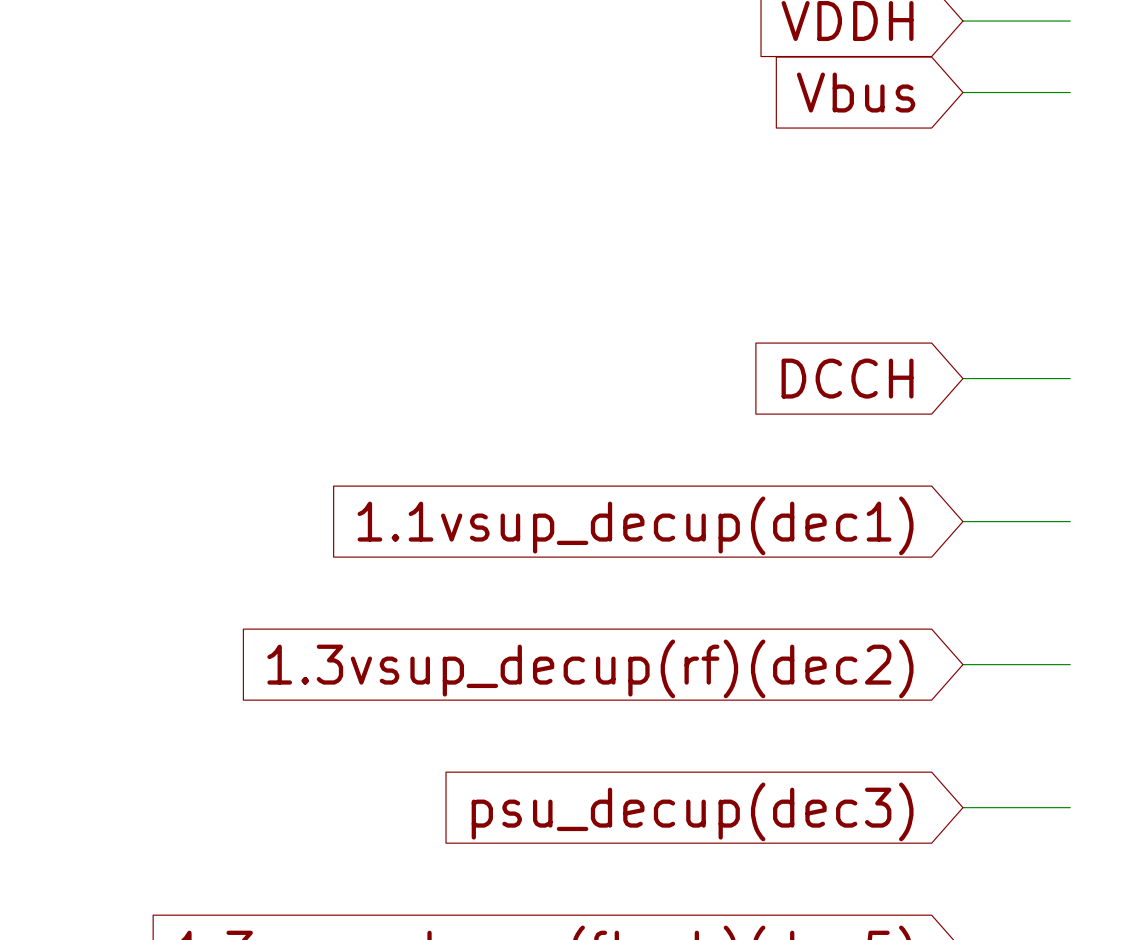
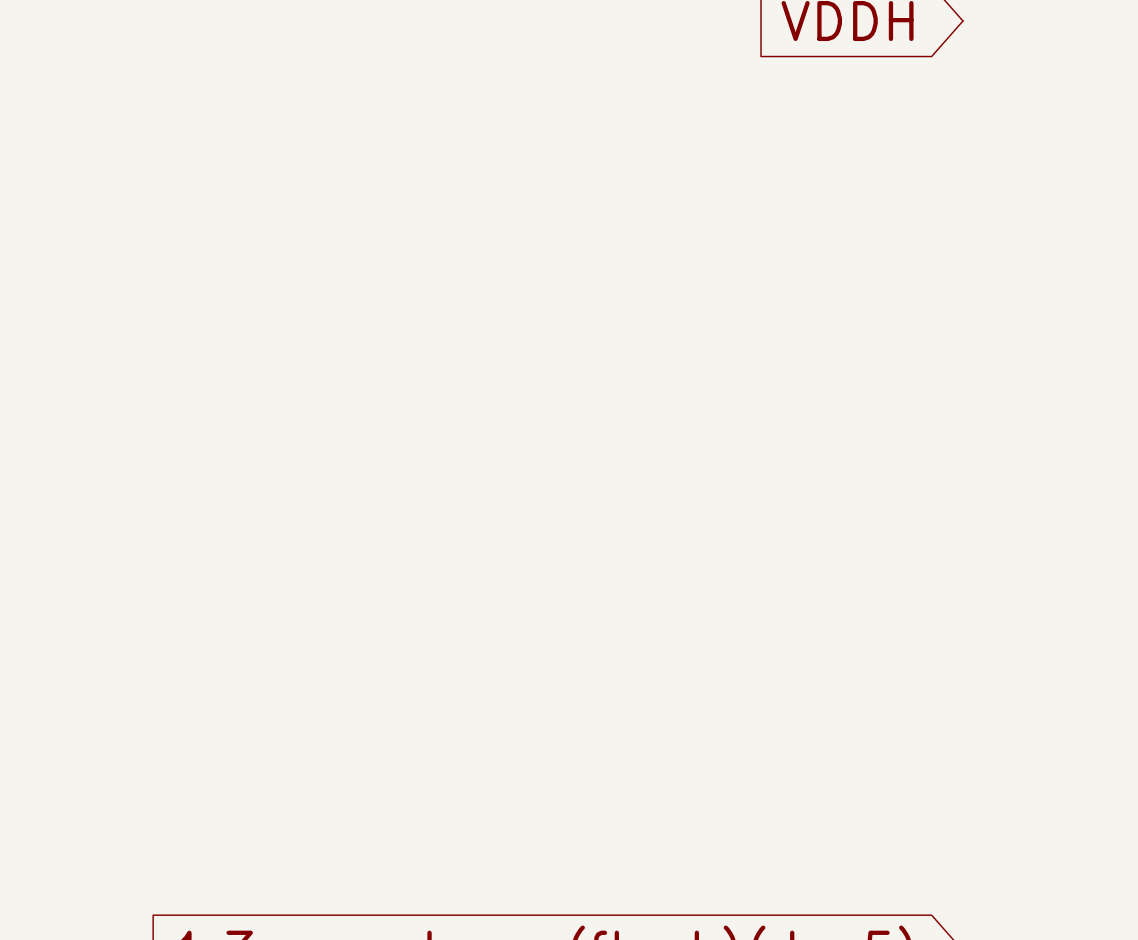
wire: (962, 21) (1070, 21) -> none
global label: Vbus (856, 92) -> none
wire: (962, 92) (1070, 92) -> none
global label: DCCH (847, 378) -> none
wire: (962, 378) (1070, 378) -> none
wire: (962, 521) (1070, 521) -> none
global label: 1.1vsup_decup(dec1) (635, 525) -> none
wire: (962, 664) (1070, 664) -> none
global label: 1.3vsup_decup(rf)(dec2) (590, 668) -> none
wire: (962, 807) (1070, 807) -> none
global label: psu_decup(dec3) (692, 811) -> none

